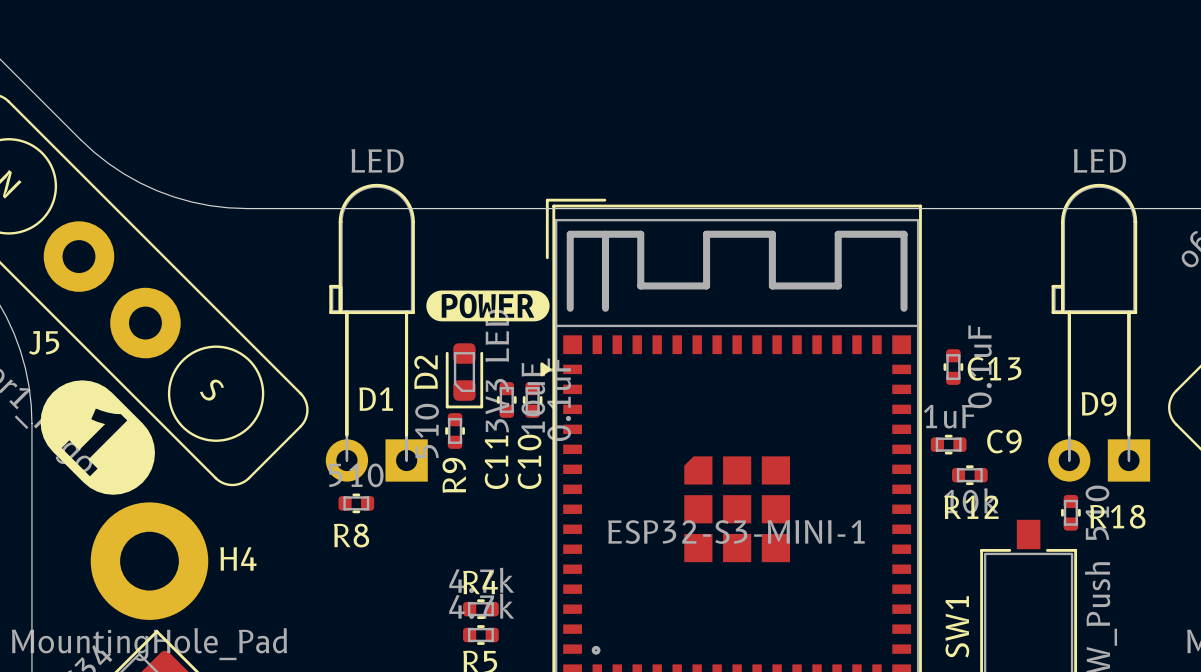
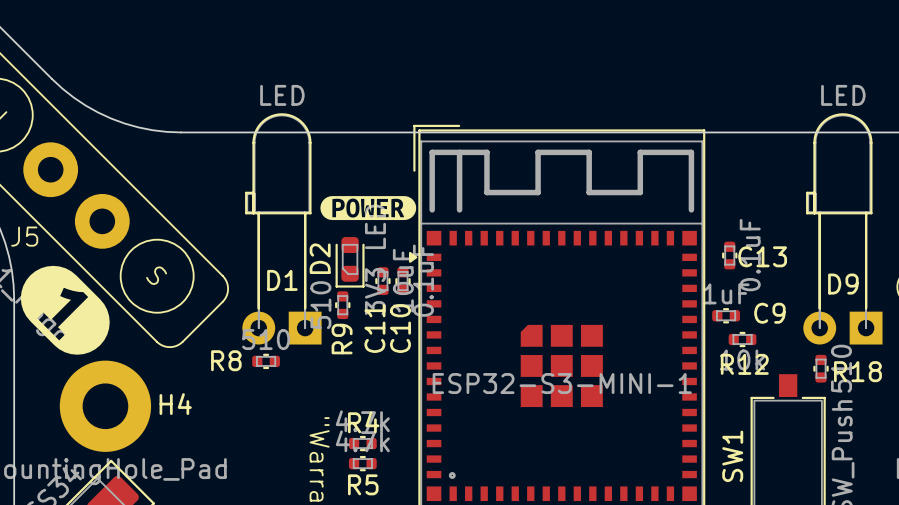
R8 name position: R8 (351, 535) -> R8 (226, 360)

